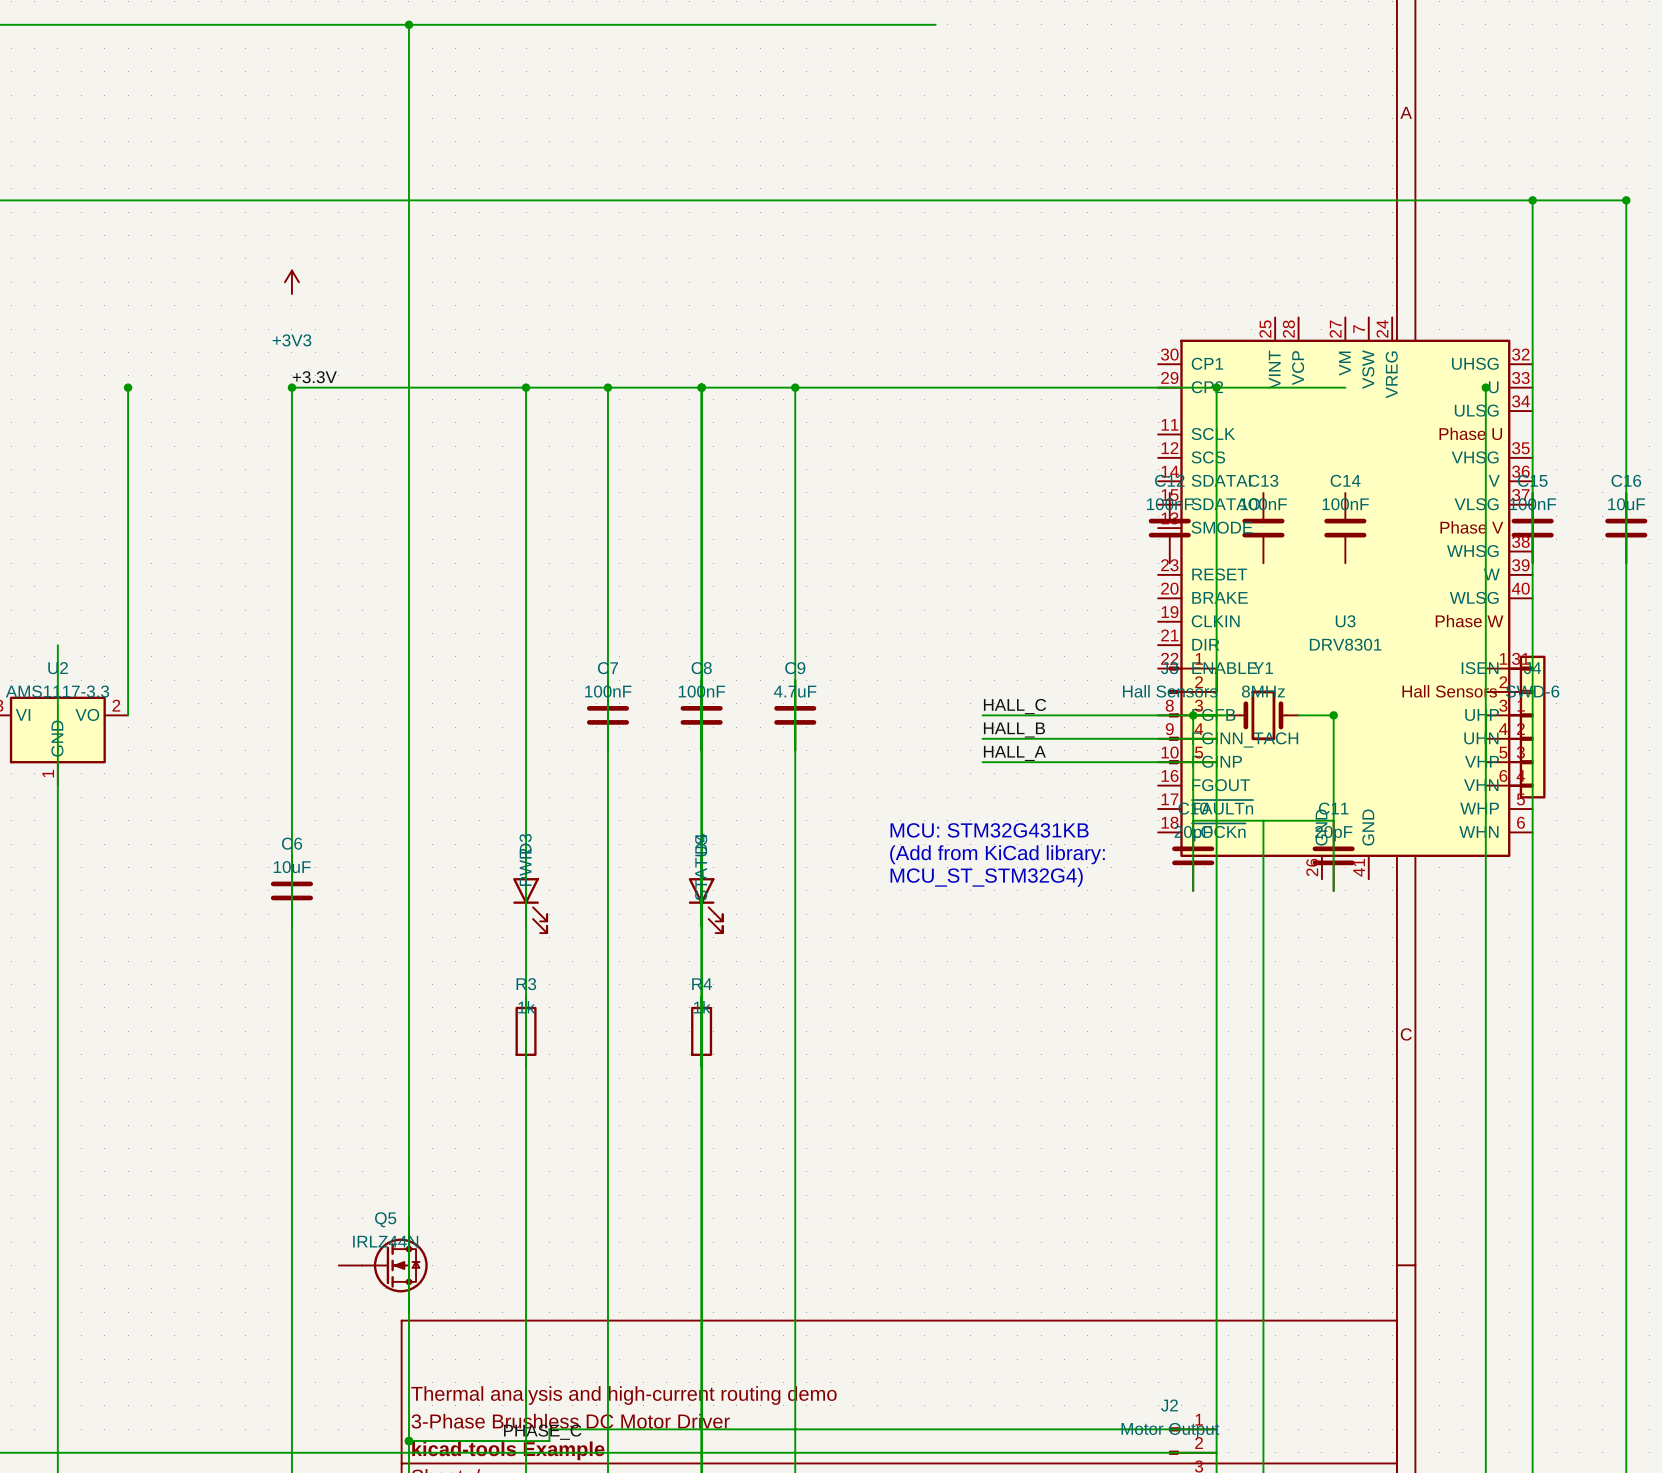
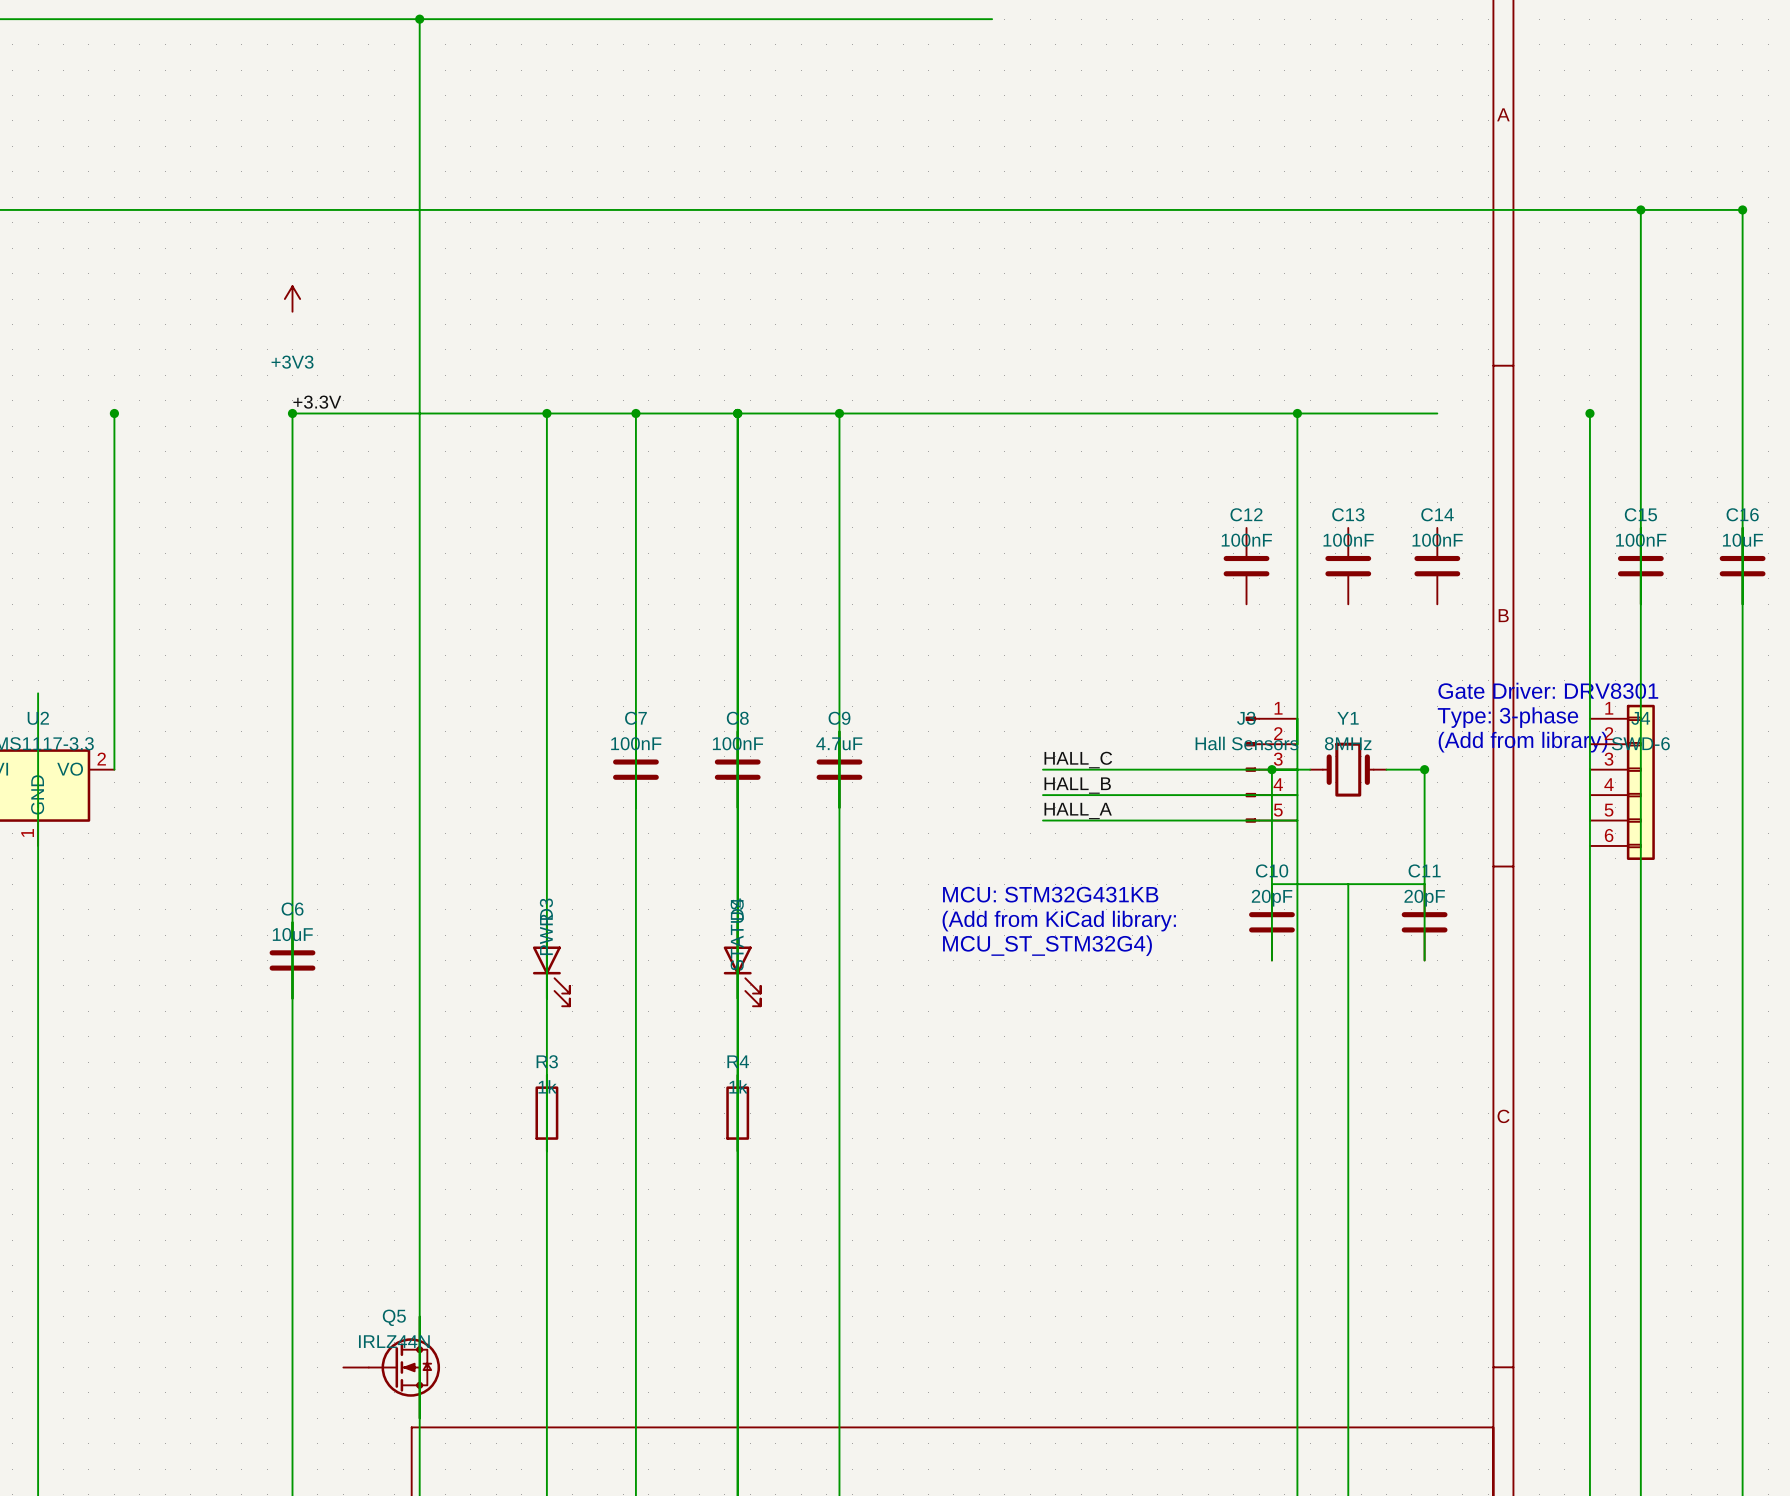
U3: DRV8301 (1345, 598) -> none
text: none -> Gate Driver: DRV8301 (1548, 690)
text: none -> Type: 3-phase (1507, 717)
text: none -> (Add from library) (1523, 742)

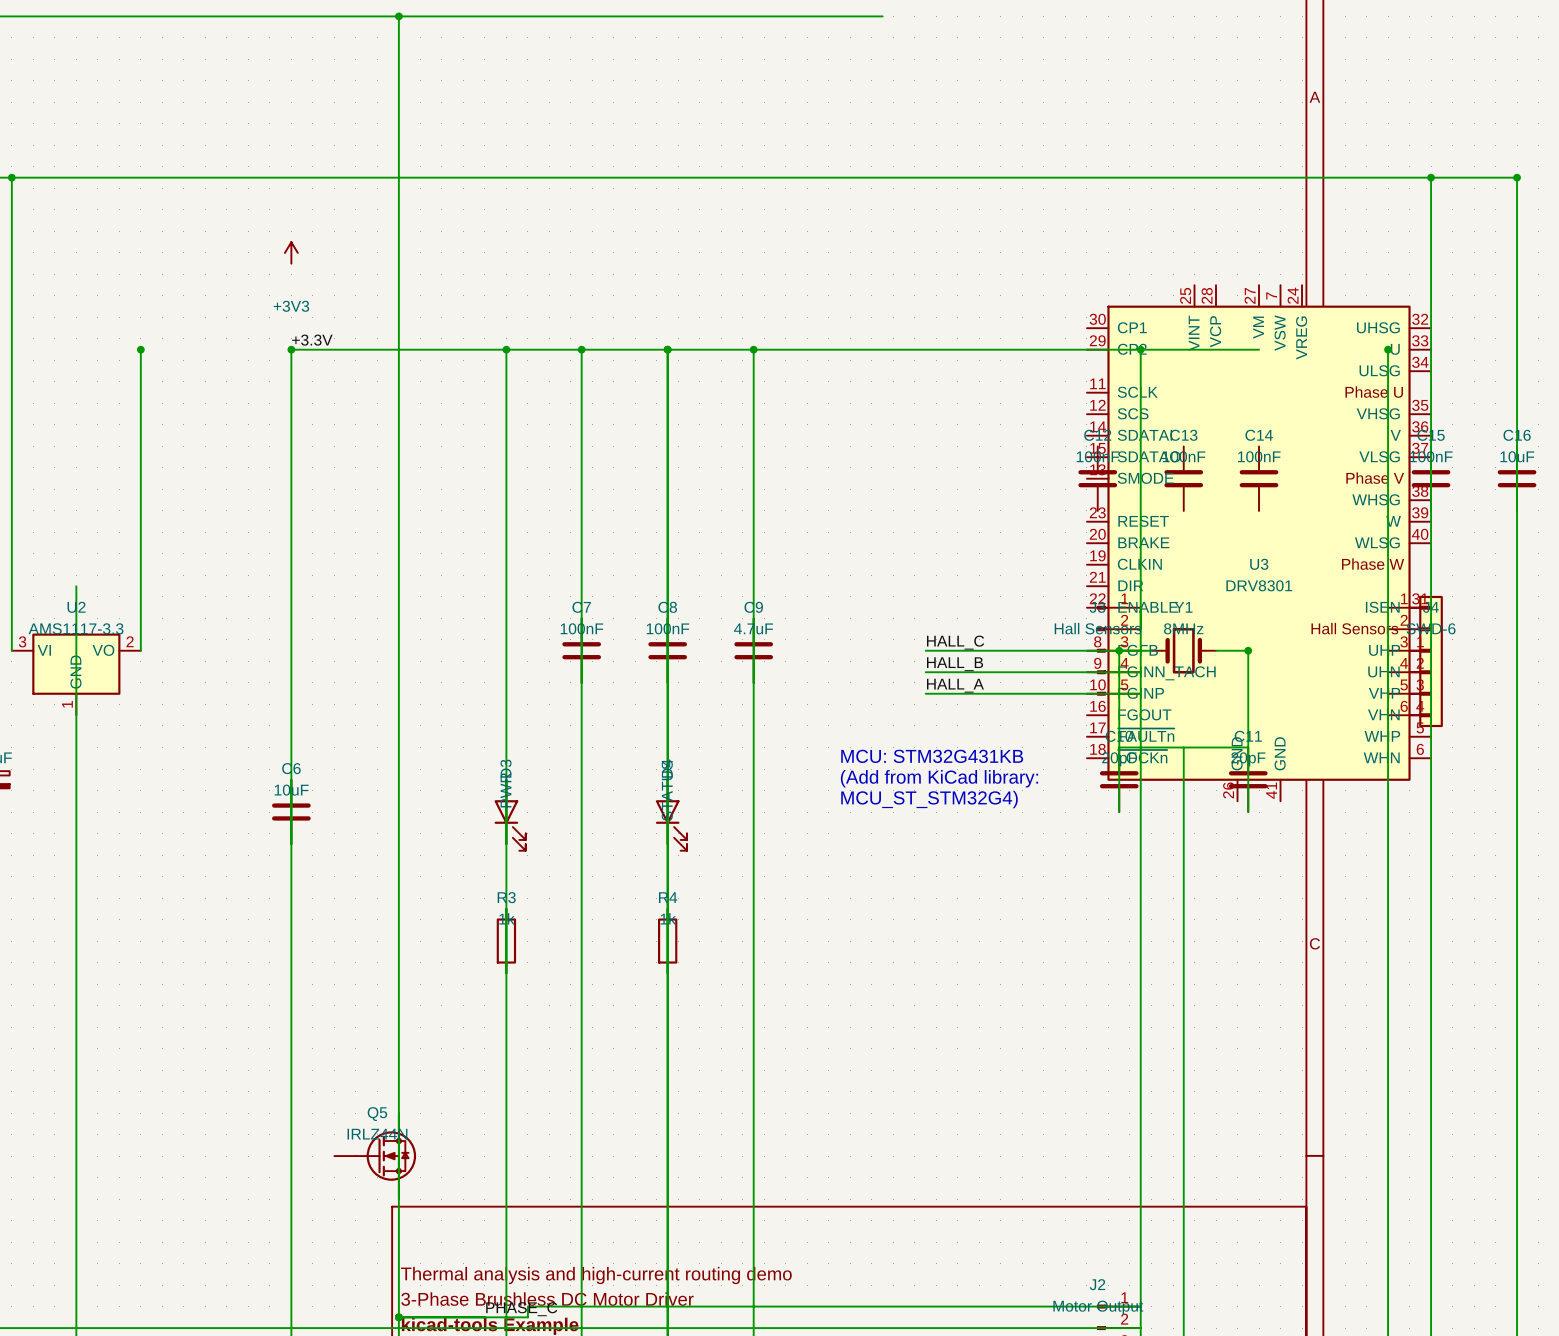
U3: none -> DRV8301 (1259, 543)
text: Gate Driver: DRV8301 (1548, 690) -> none
text: Type: 3-phase (1507, 717) -> none
text: (Add from library) (1523, 742) -> none

